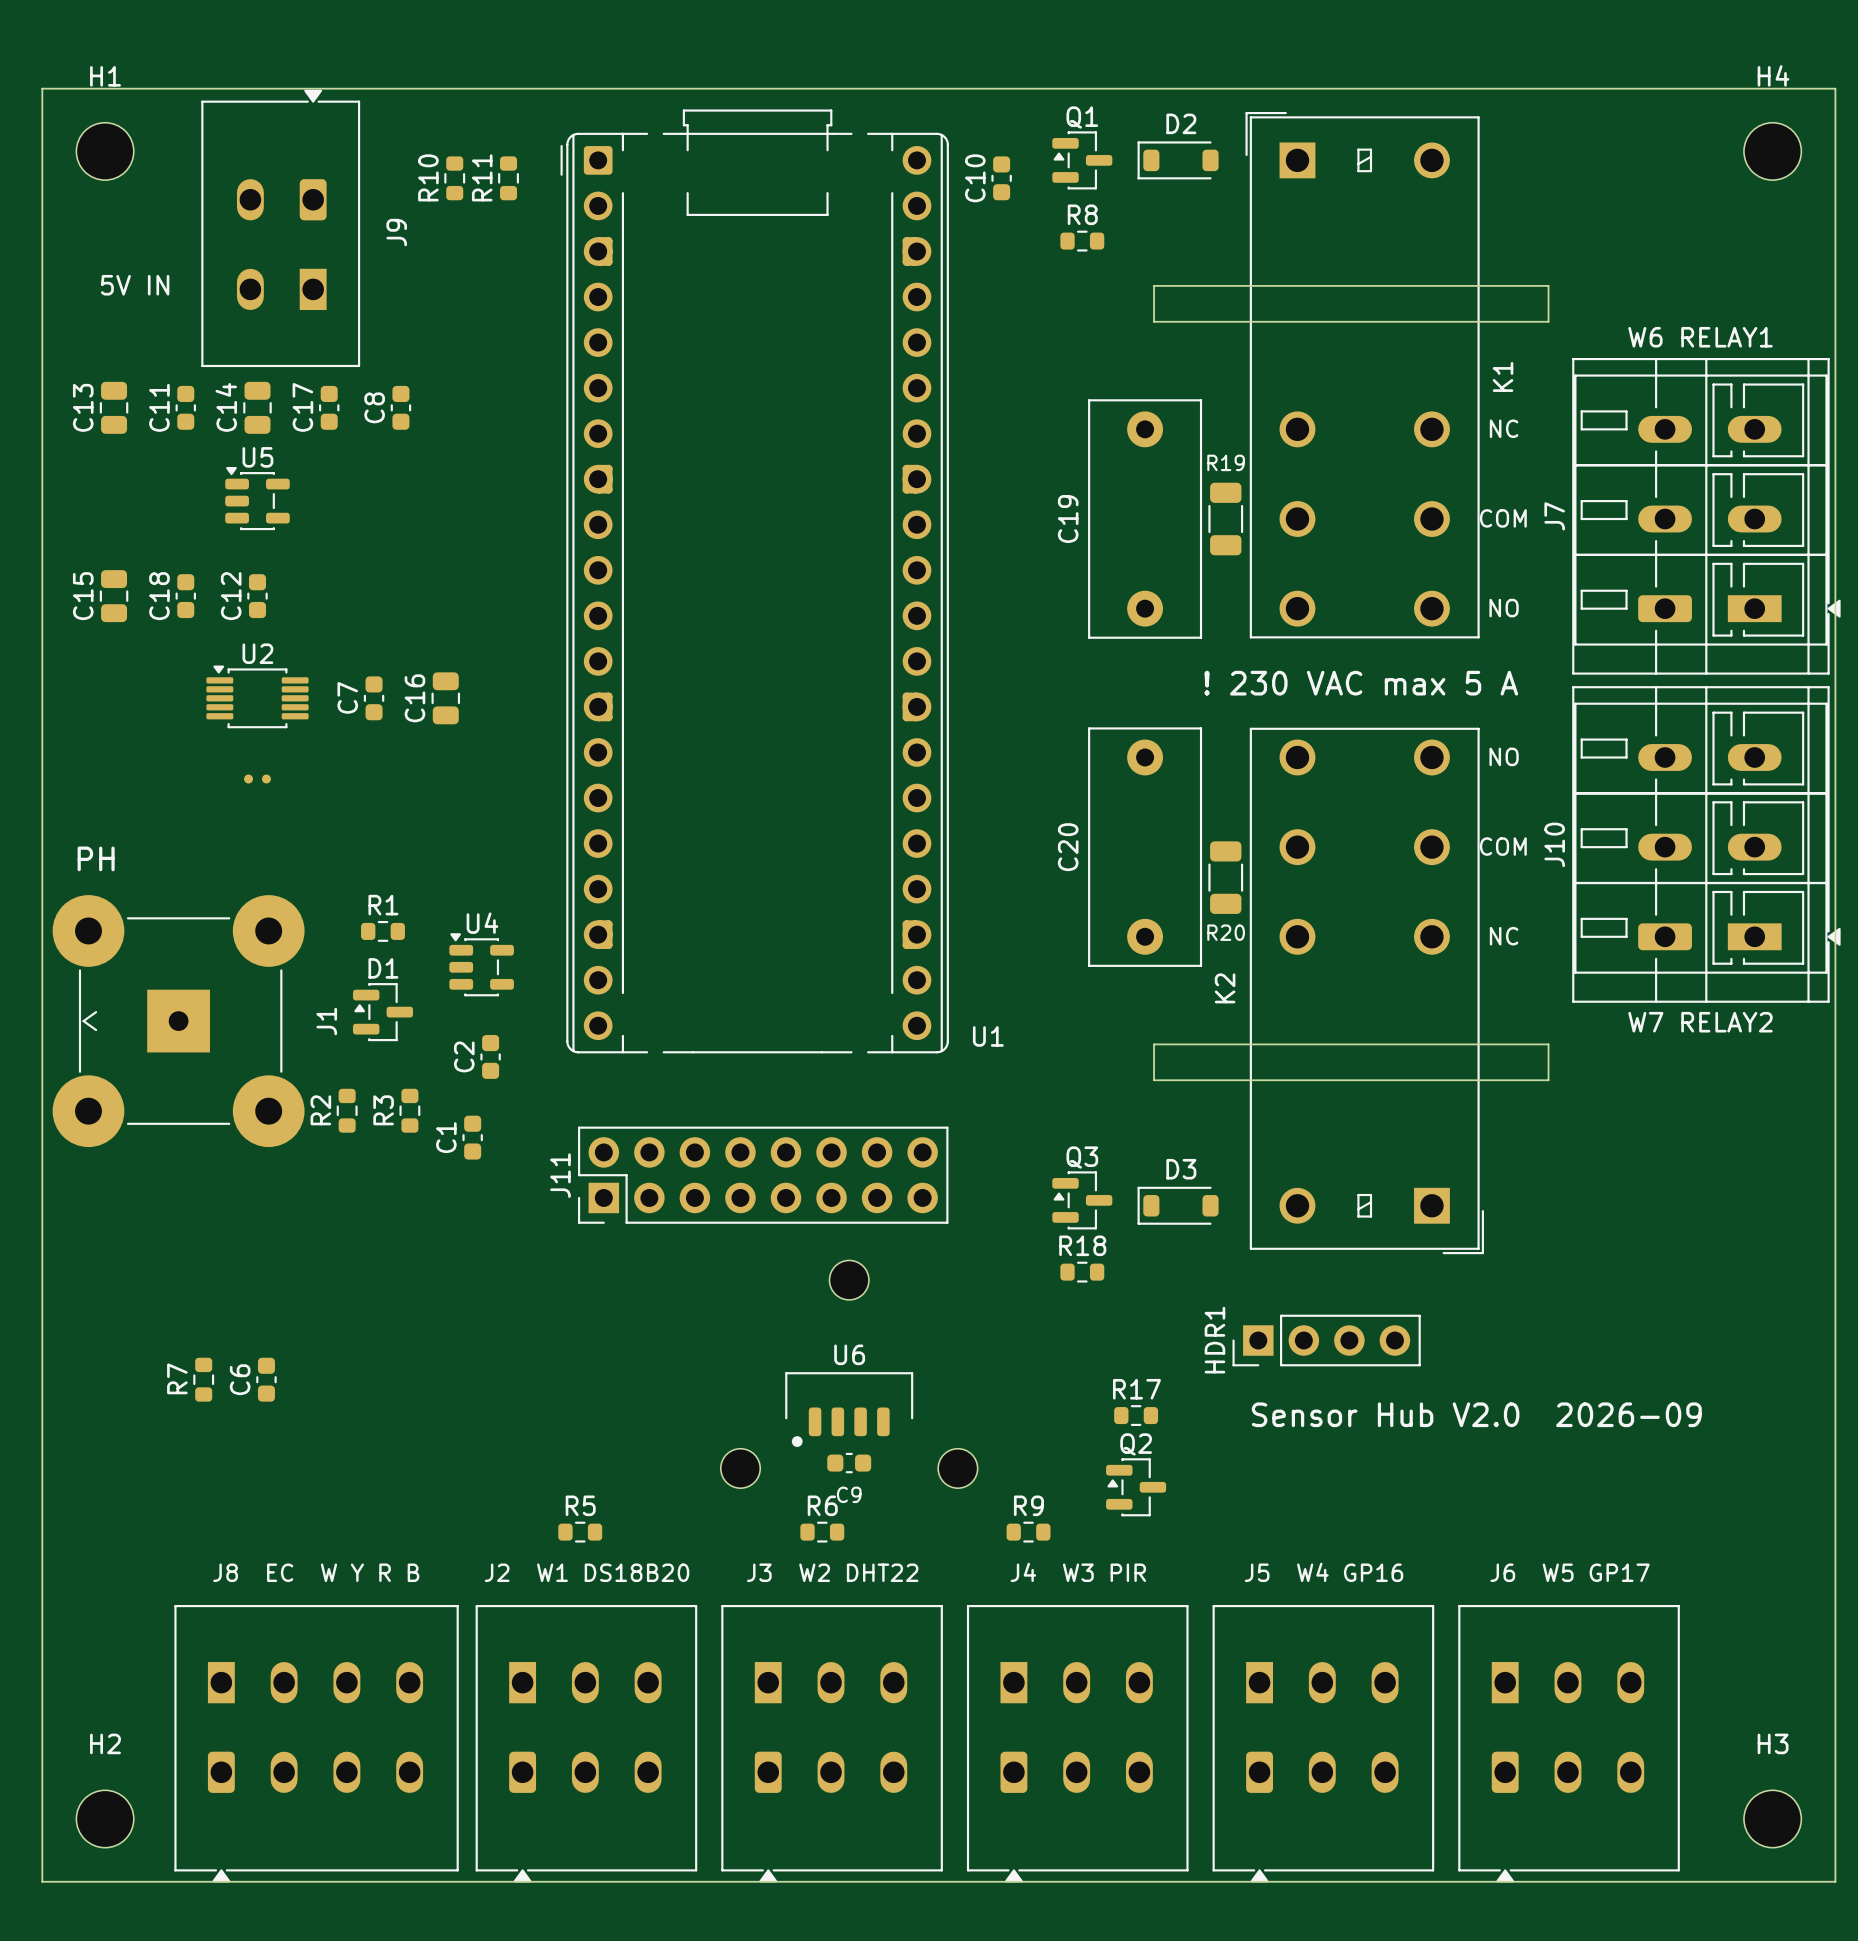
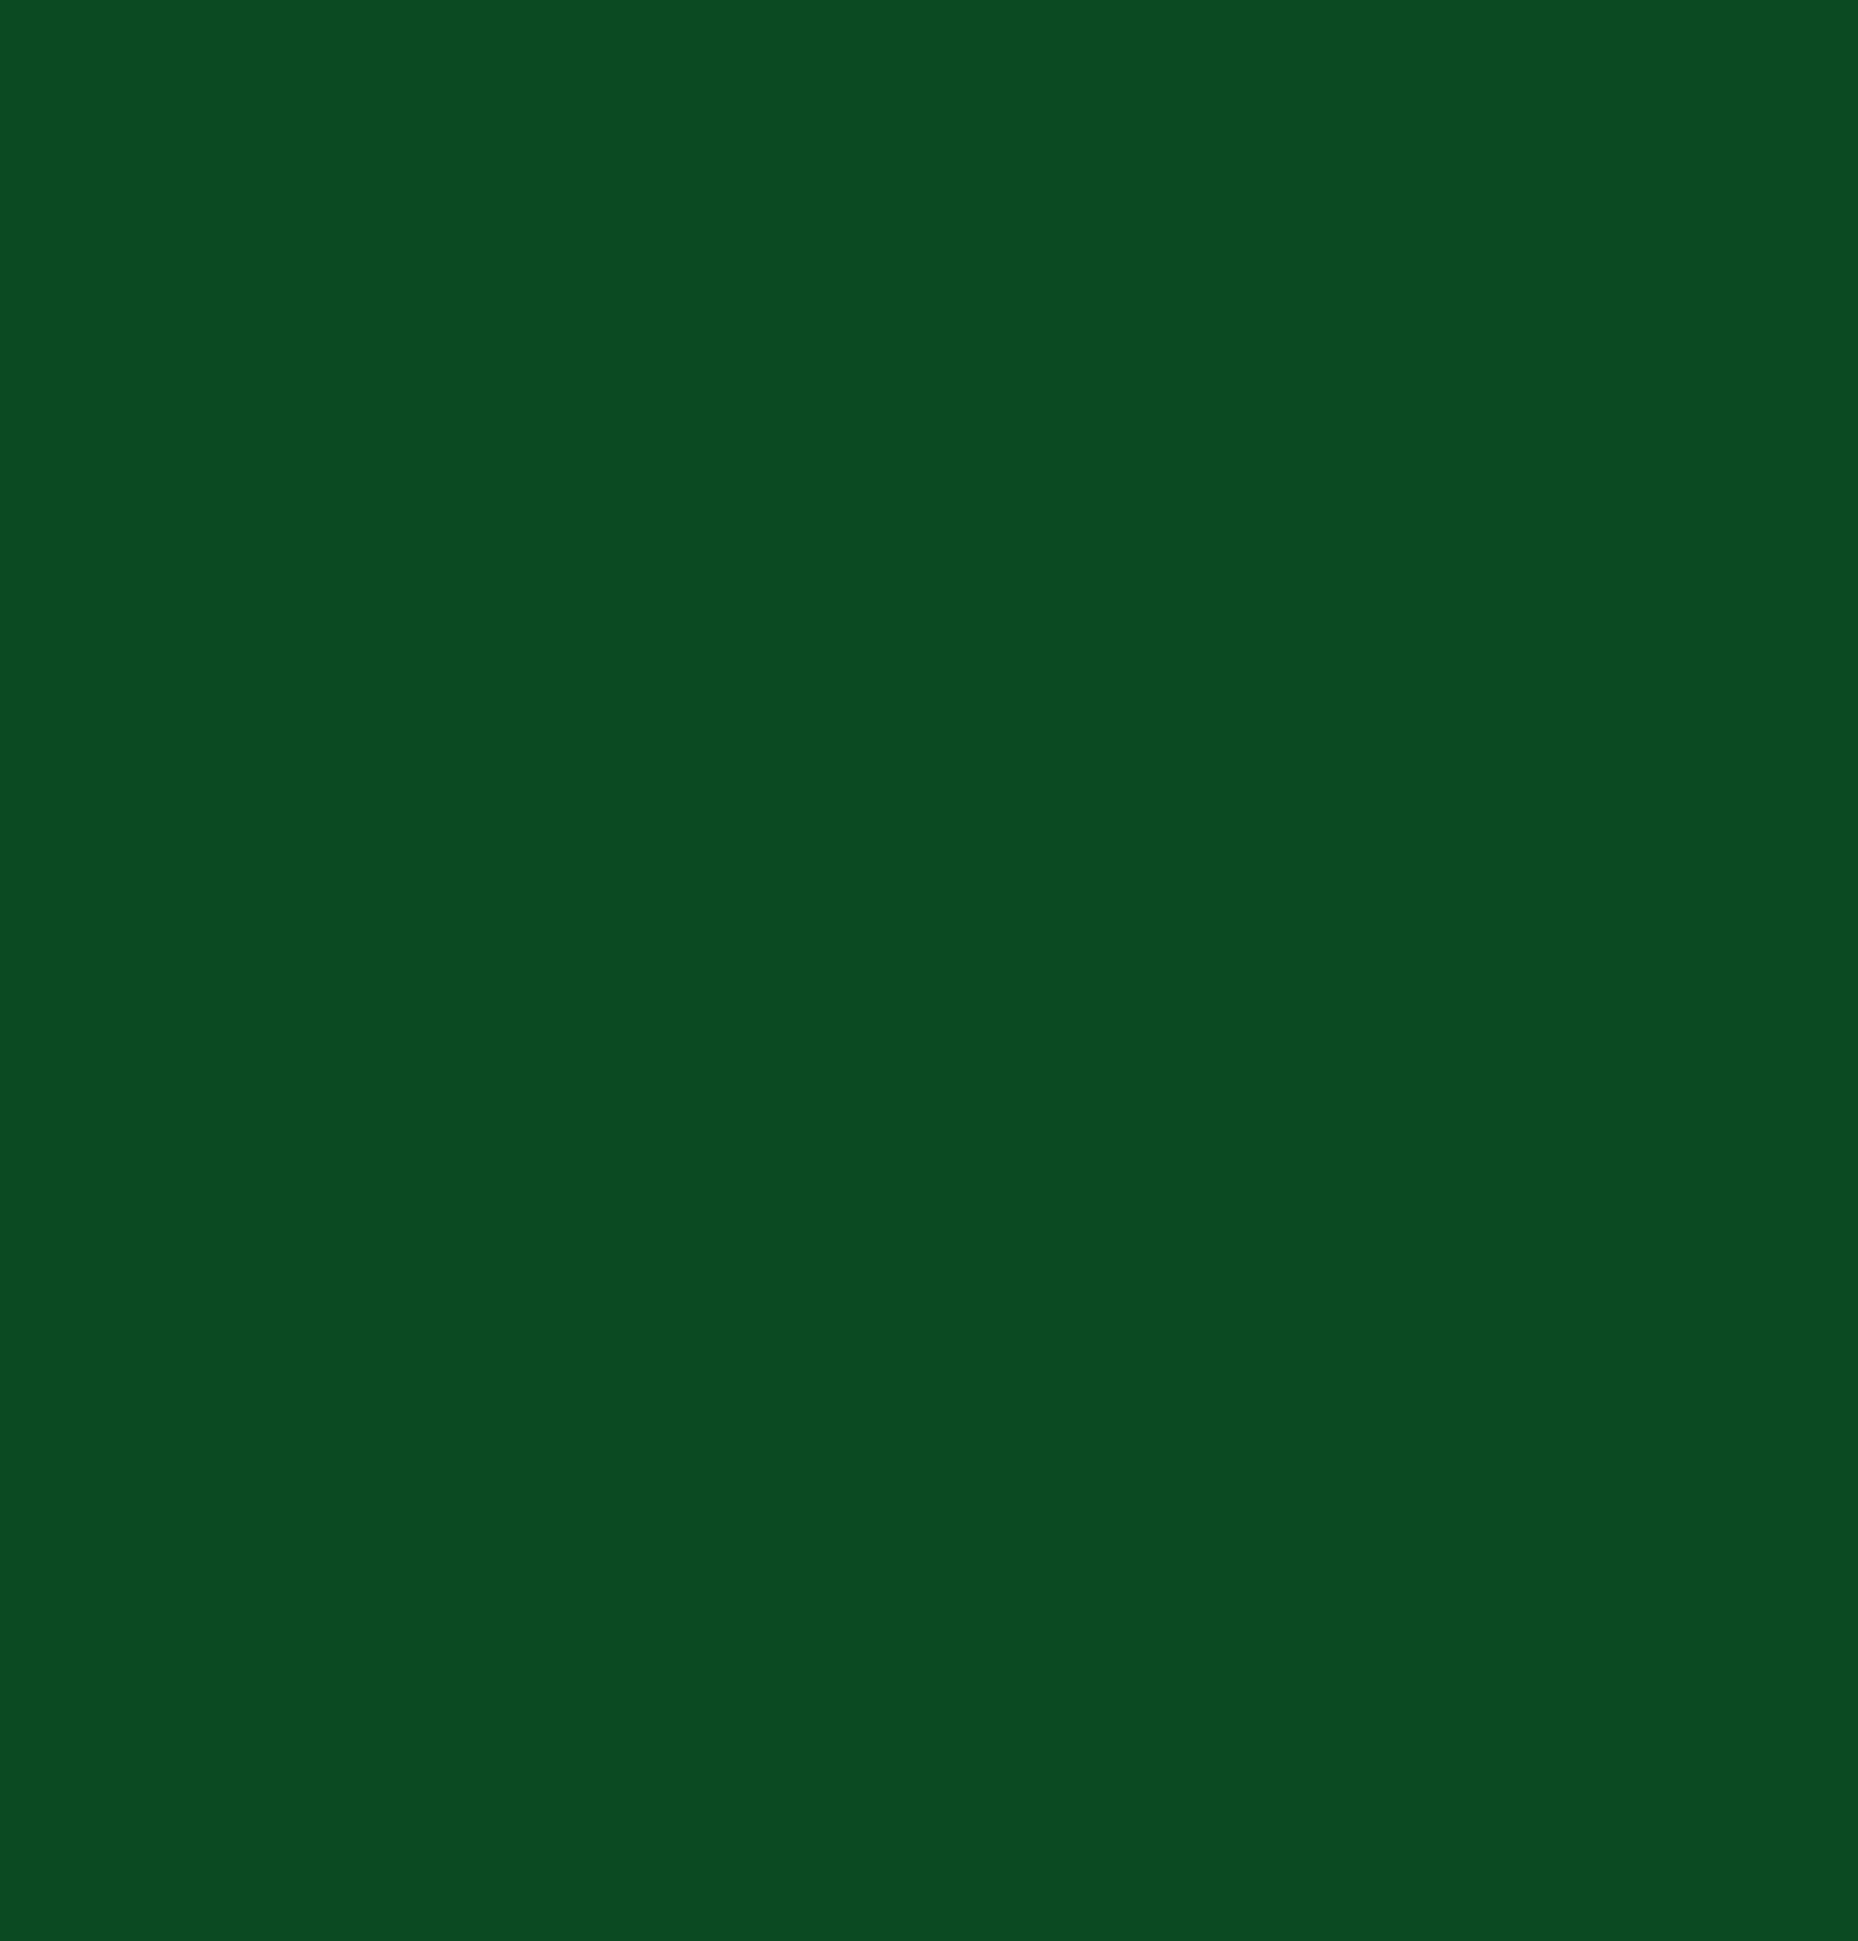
board edge: (42, 88) (1835, 88) (1835, 1881) (42, 1881) (42, 88) -> none
H1: (105, 151) -> none
H4: (1772, 151) -> none
Q1: (1082, 160) -> none
D2: (1178, 160) -> none
R10: (454, 178) -> none
R11: (508, 178) -> none
C10: (1001, 178) -> none
J9: (280, 228) -> none
R8: (1082, 241) -> none
text: 5V IN (135, 285) -> none
board edge: (1154, 285) (1548, 285) (1548, 321) (1154, 321) (1154, 285) -> none
text: W6 RELAY1 (1700, 337) -> none
K1: (1362, 375) -> none
C13: (114, 407) -> none
C11: (185, 407) -> none
C14: (257, 407) -> none
C17: (329, 407) -> none
C8: (400, 407) -> none
text: NC (1504, 428) -> none
U5: (257, 498) -> none
J7: (1706, 516) -> none
text: COM (1503, 518) -> none
C19: (1145, 519) -> none
R19: (1225, 519) -> none
U1: (754, 581) -> none
C15: (114, 596) -> none
C18: (185, 596) -> none
C12: (257, 596) -> none
text: NO (1504, 608) -> none
text: ! 230 VAC max 5 A (1361, 683) -> none
U2: (257, 696) -> none
C7: (374, 698) -> none
C16: (445, 698) -> none
text: NO (1504, 756) -> none
part: (257, 779) -> none
J10: (1706, 844) -> none
text: COM (1503, 846) -> none
C20: (1145, 847) -> none
text: PH (96, 858) -> none
R20: (1225, 877) -> none
R1: (383, 931) -> none
text: NC (1504, 936) -> none
U4: (481, 964) -> none
K2: (1366, 990) -> none
D1: (383, 1012) -> none
J1: (178, 1021) -> none
text: W7 RELAY2 (1700, 1022) -> none
board edge: (1154, 1044) (1154, 1080) (1548, 1080) (1548, 1044) (1154, 1044) -> none
C2: (490, 1056) -> none
R2: (347, 1110) -> none
R3: (409, 1110) -> none
C1: (472, 1137) -> none
J11: (763, 1175) -> none
Q3: (1082, 1200) -> none
D3: (1178, 1205) -> none
R18: (1082, 1272) -> none
part: (849, 1280) -> none
HDR1: (1326, 1340) -> none
R7: (203, 1379) -> none
C6: (266, 1379) -> none
U6: (849, 1409) -> none
text: Sensor Hub V2.0 2026-09 (1476, 1414) -> none
R17: (1136, 1415) -> none
C9: (849, 1463) -> none
part: (740, 1468) -> none
part: (957, 1468) -> none
Q2: (1136, 1487) -> none
R5: (580, 1532) -> none
R6: (822, 1532) -> none
R9: (1028, 1532) -> none
text: J8 EC W Y R B (316, 1572) -> none
text: J2 W1 DS18B20 (587, 1572) -> none
text: J3 W2 DHT22 (832, 1572) -> none
text: J4 W3 PIR (1078, 1572) -> none
text: J5 W4 GP16 (1324, 1572) -> none
text: J6 W5 GP17 (1570, 1572) -> none
part: (316, 1743) -> none
part: (586, 1743) -> none
part: (832, 1743) -> none
part: (1077, 1743) -> none
part: (1323, 1743) -> none
part: (1569, 1743) -> none
H2: (105, 1819) -> none
H3: (1772, 1819) -> none

